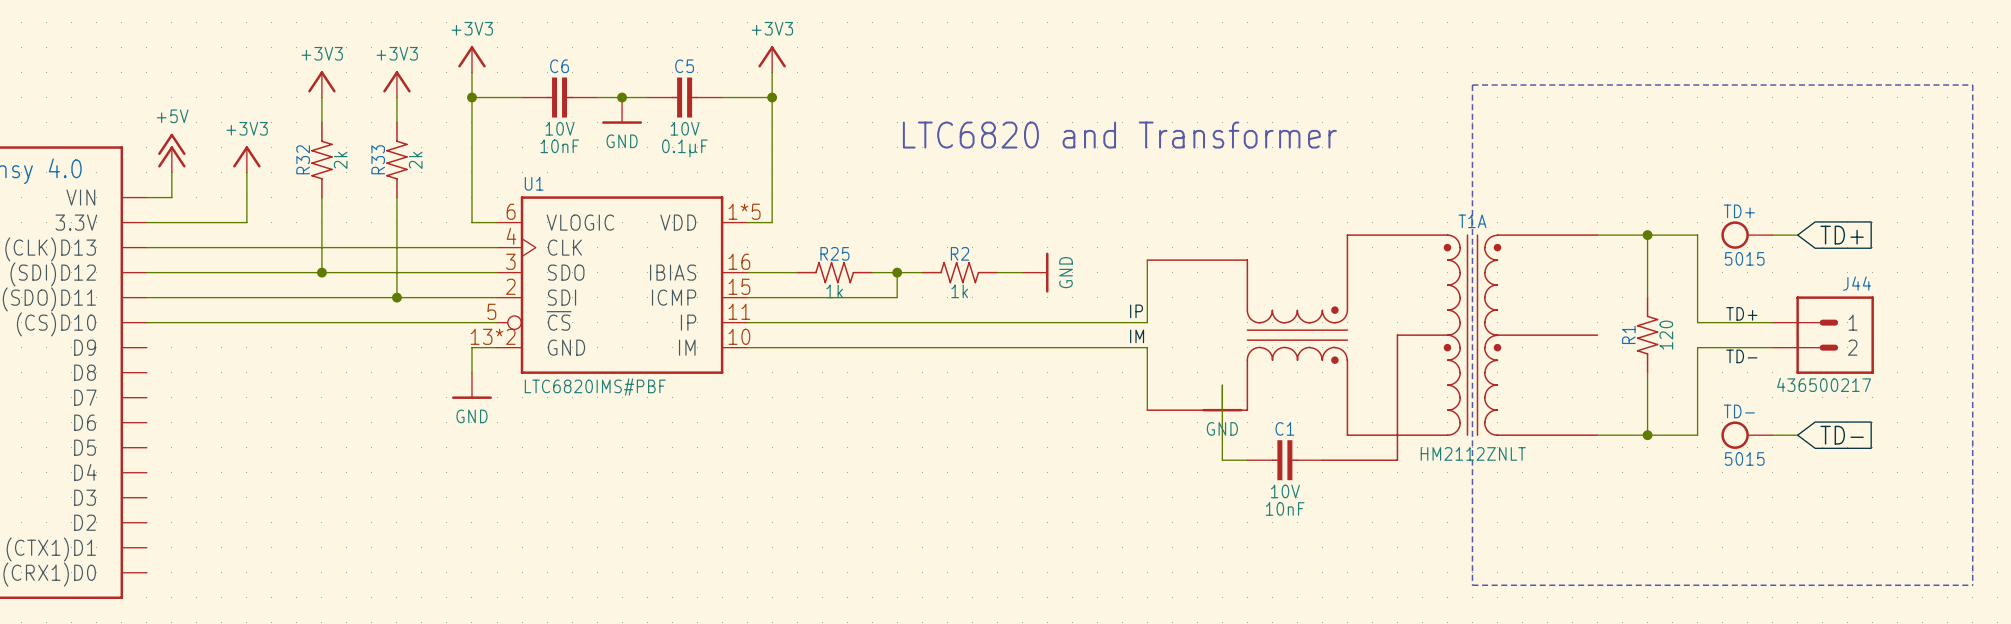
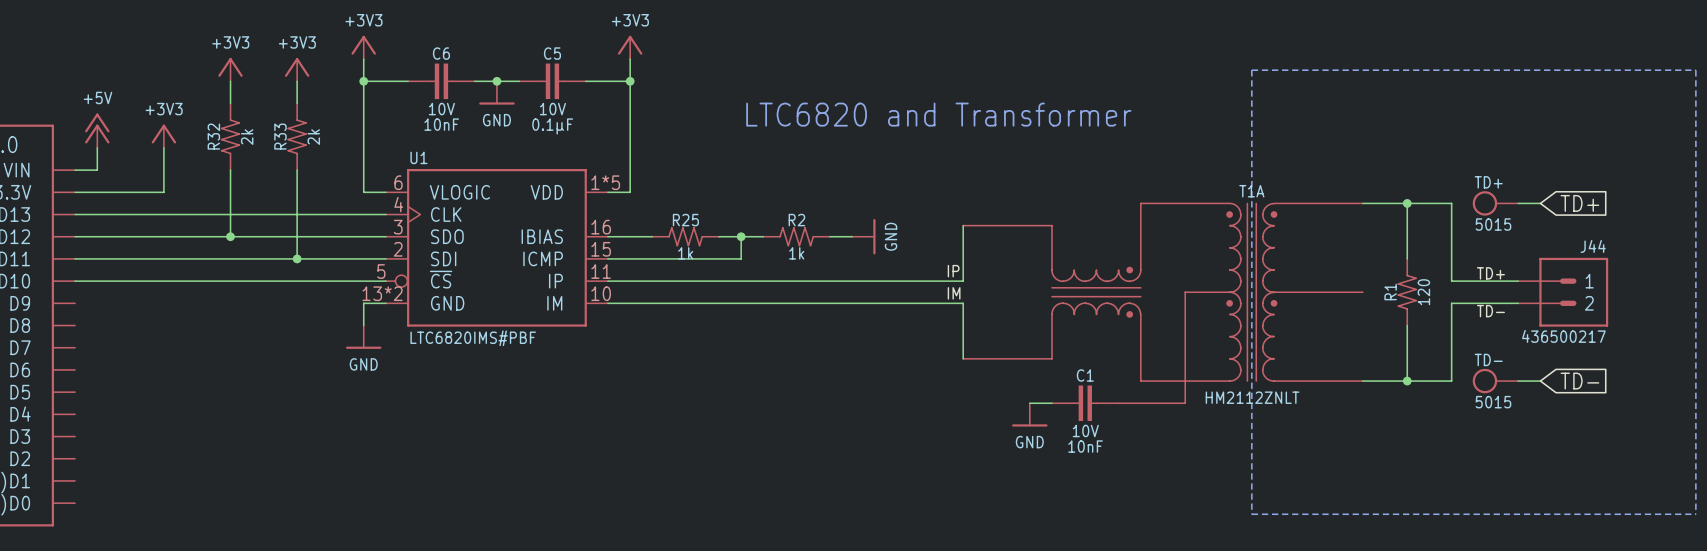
wire: (1222, 385) (1222, 460) -> none
power symbol position: GND (1222, 398) -> GND (1029, 414)

